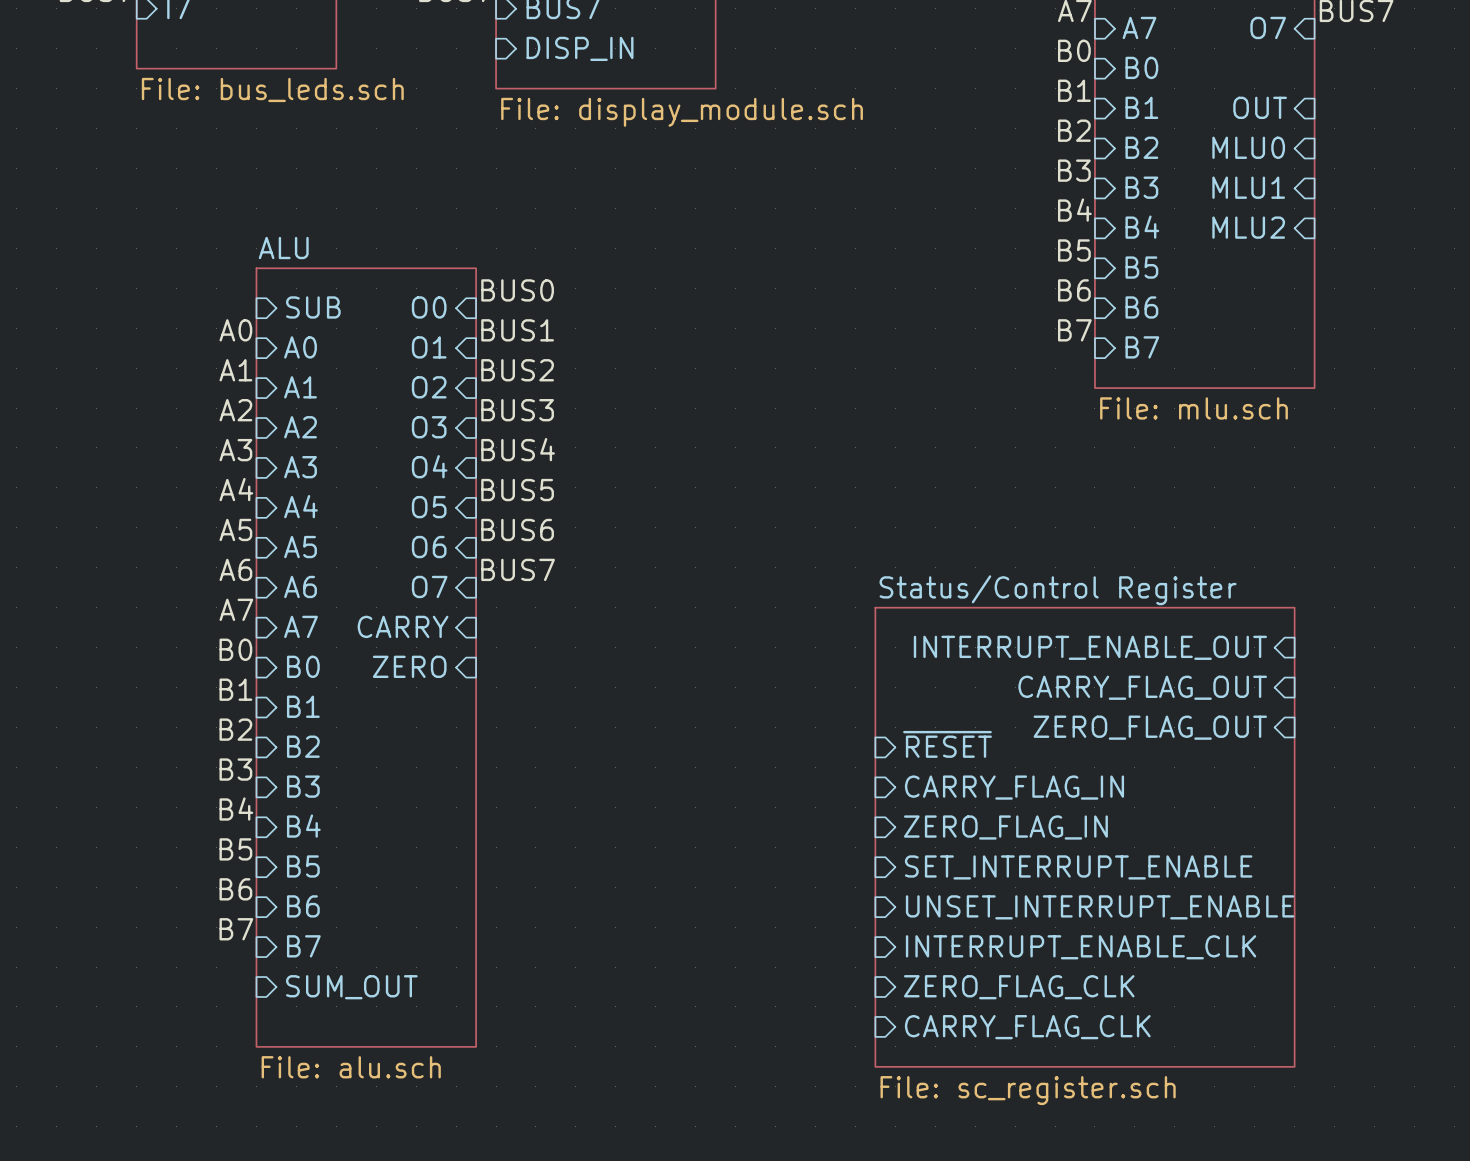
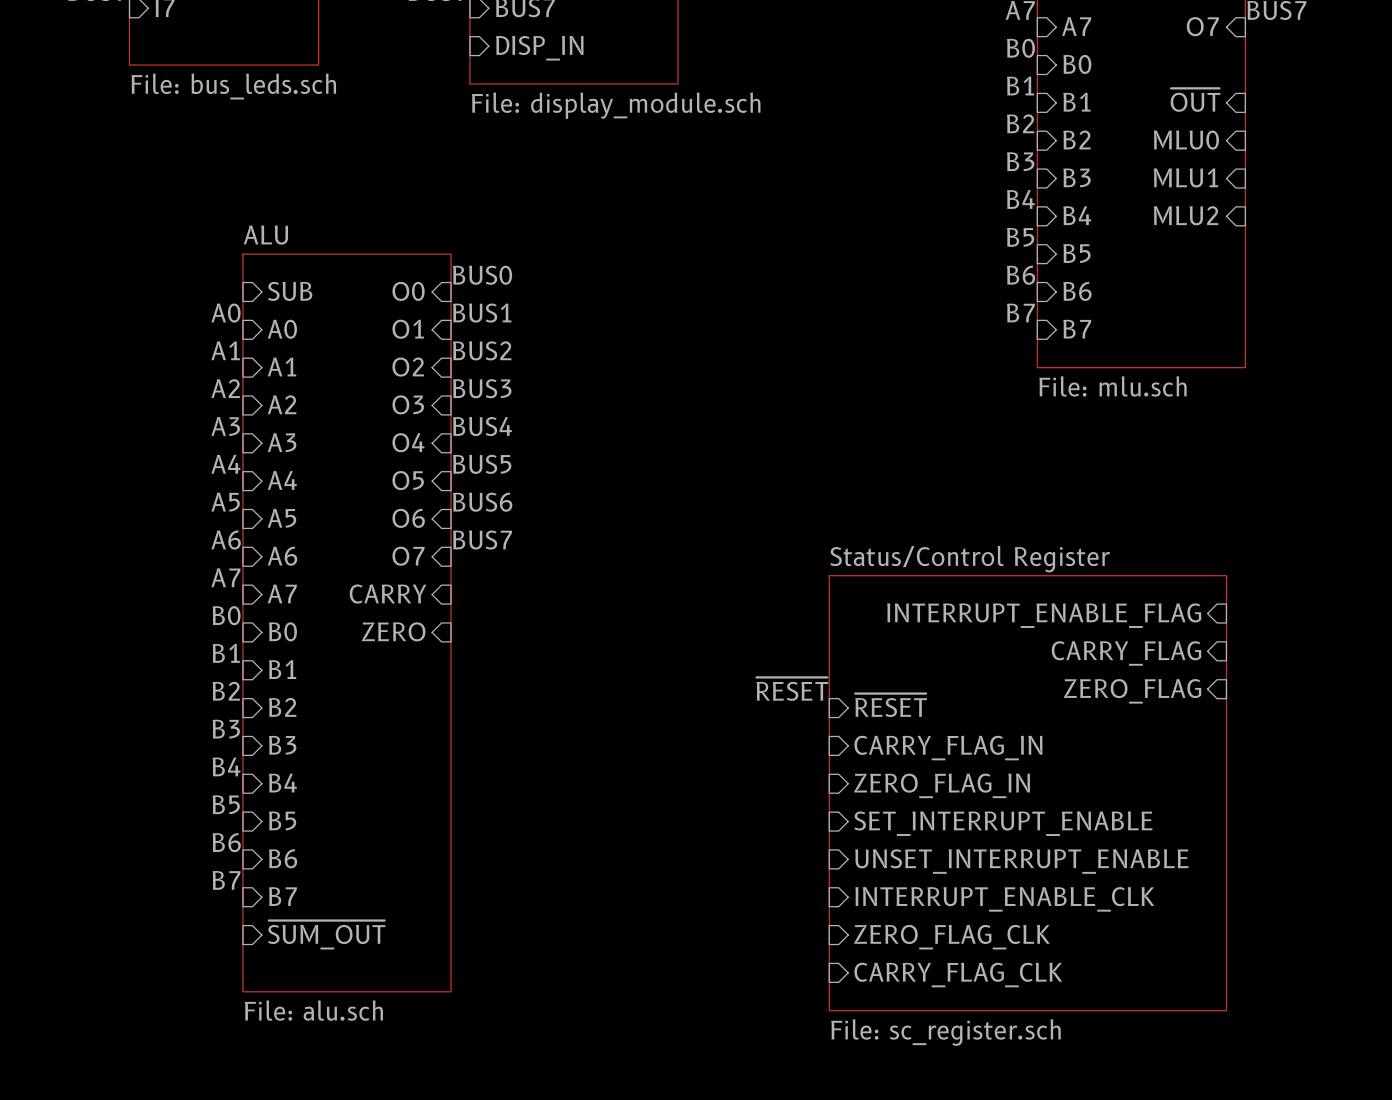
sheet pin: OUT (1260, 107) -> ~{OUT} (1195, 100)
sheet pin: INTERRUPT_ENABLE_OUT (1090, 647) -> INTERRUPT_ENABLE_FLAG (1044, 615)
sheet pin: CARRY_FLAG_OUT (1142, 687) -> CARRY_FLAG (1126, 653)
label: none -> ~{RESET} (792, 689)
sheet pin: ZERO_FLAG_OUT (1150, 727) -> ZERO_FLAG (1132, 691)
sheet pin: SUM_OUT (351, 987) -> ~{SUM_OUT} (326, 935)

